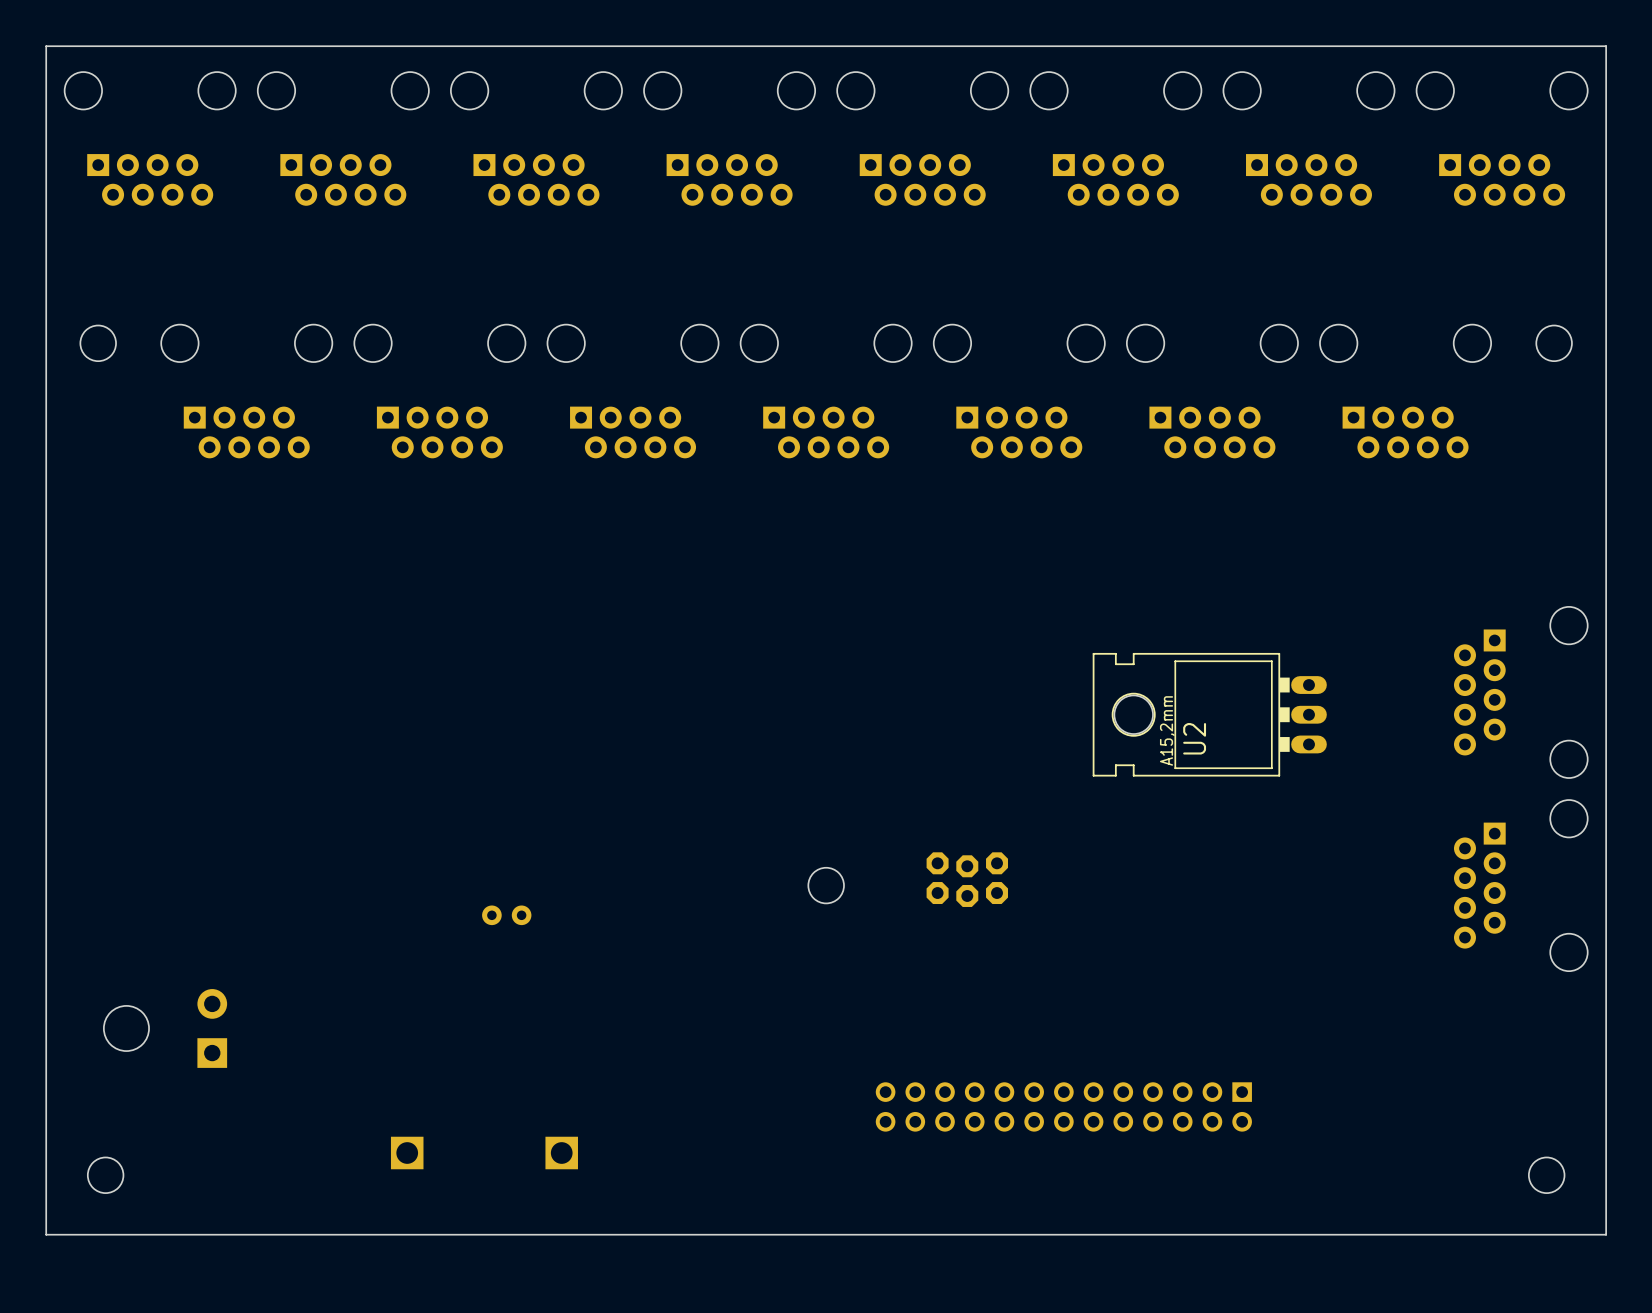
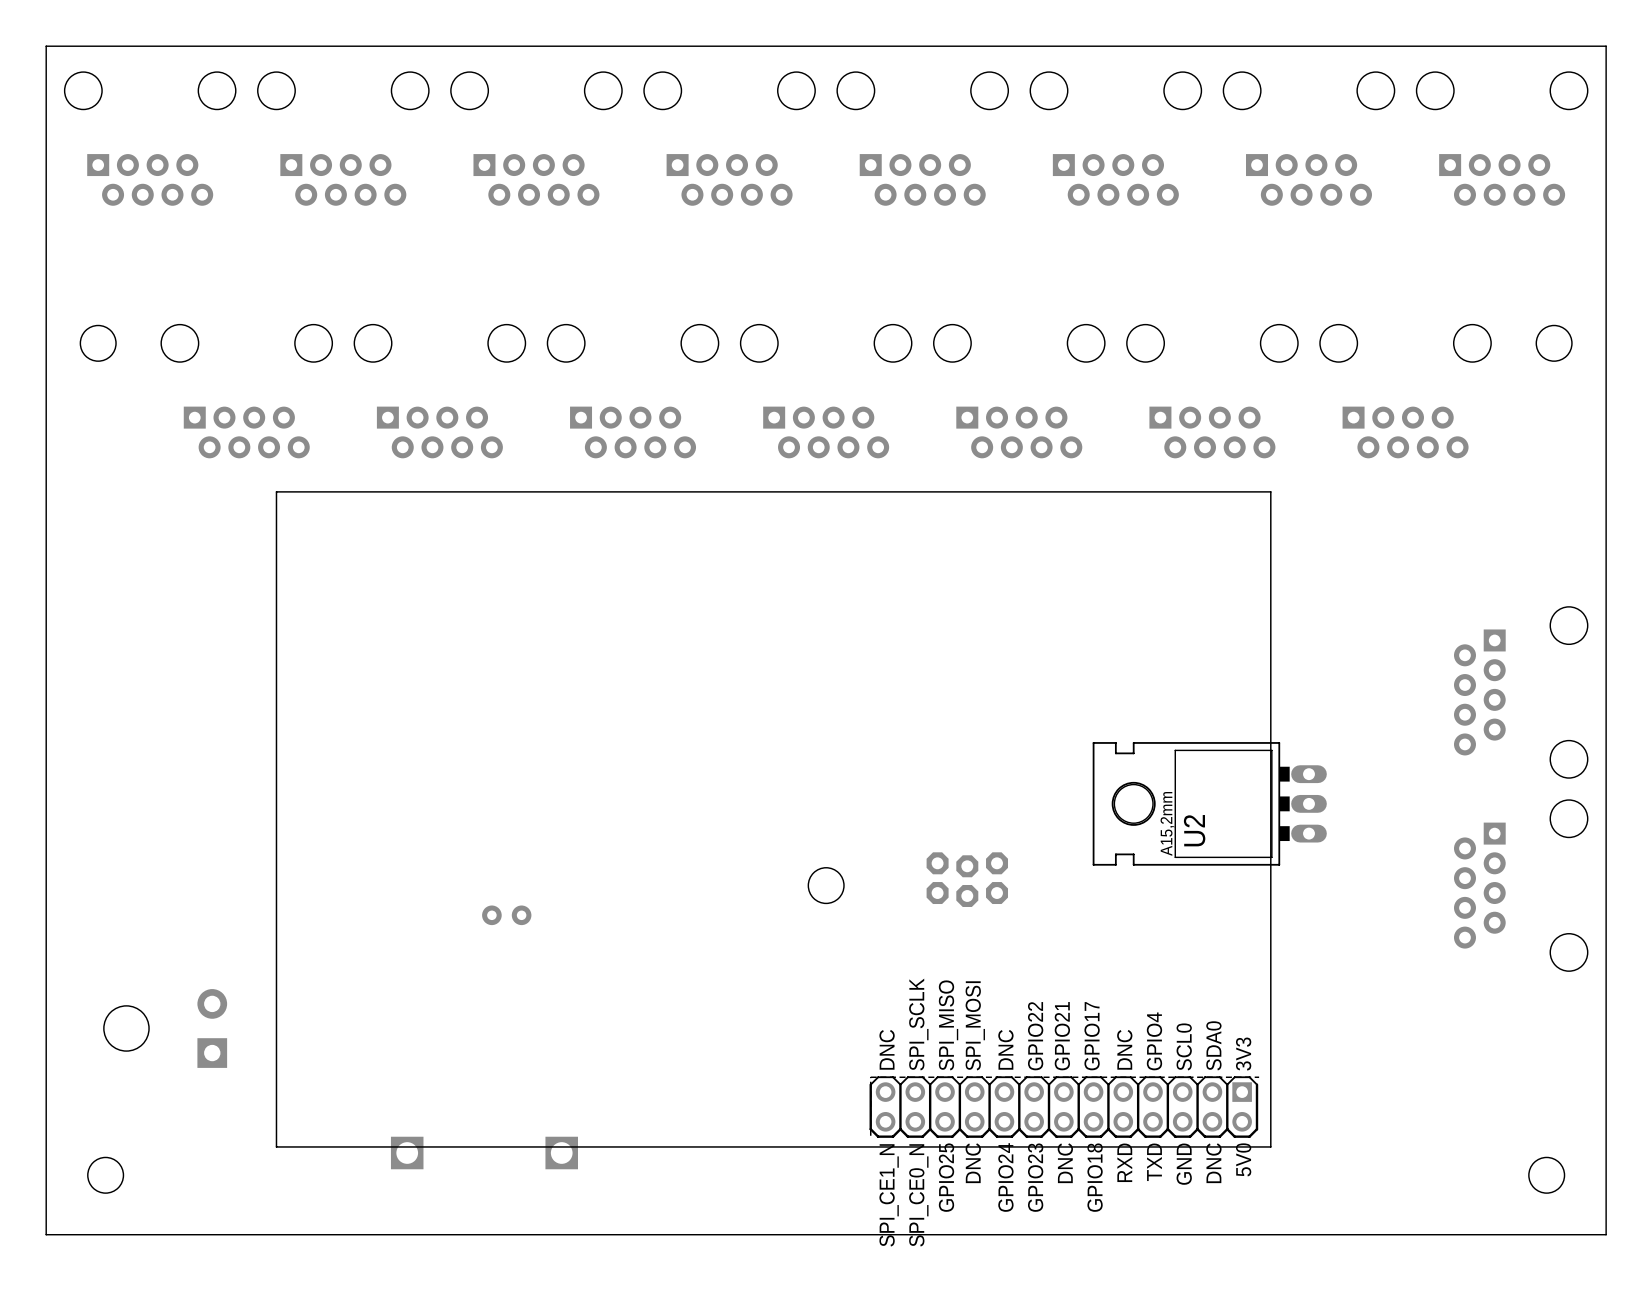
U2 position: (1209, 714) -> (1209, 803)
part: none -> (773, 819)
part: (1063, 1106) -> none

